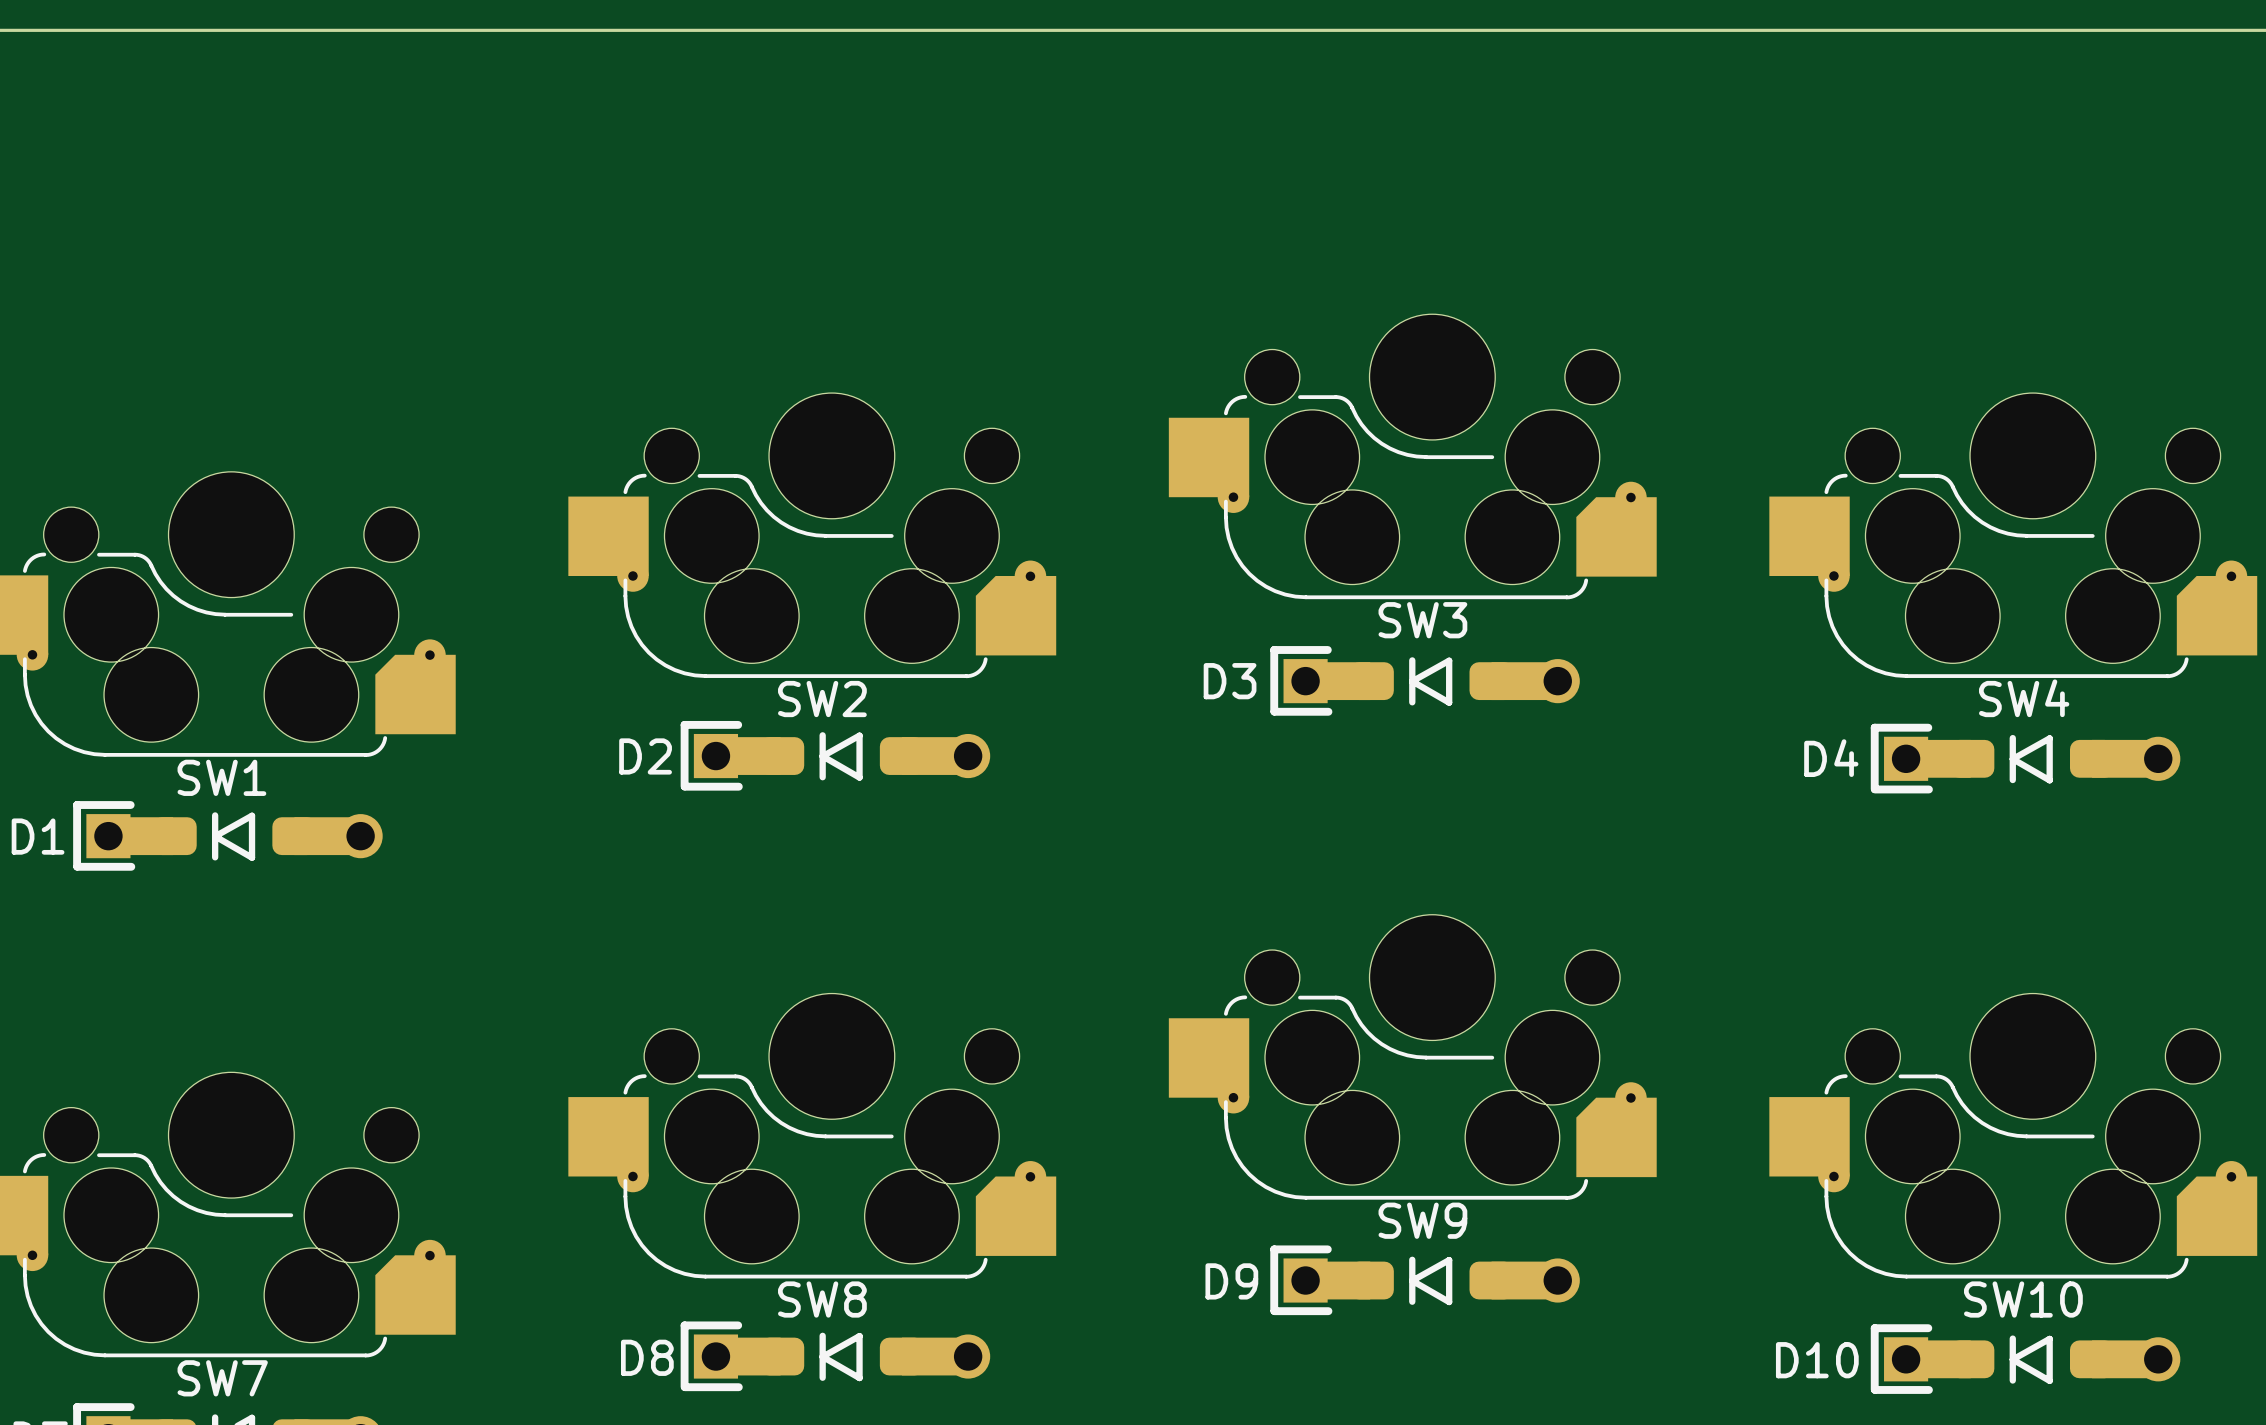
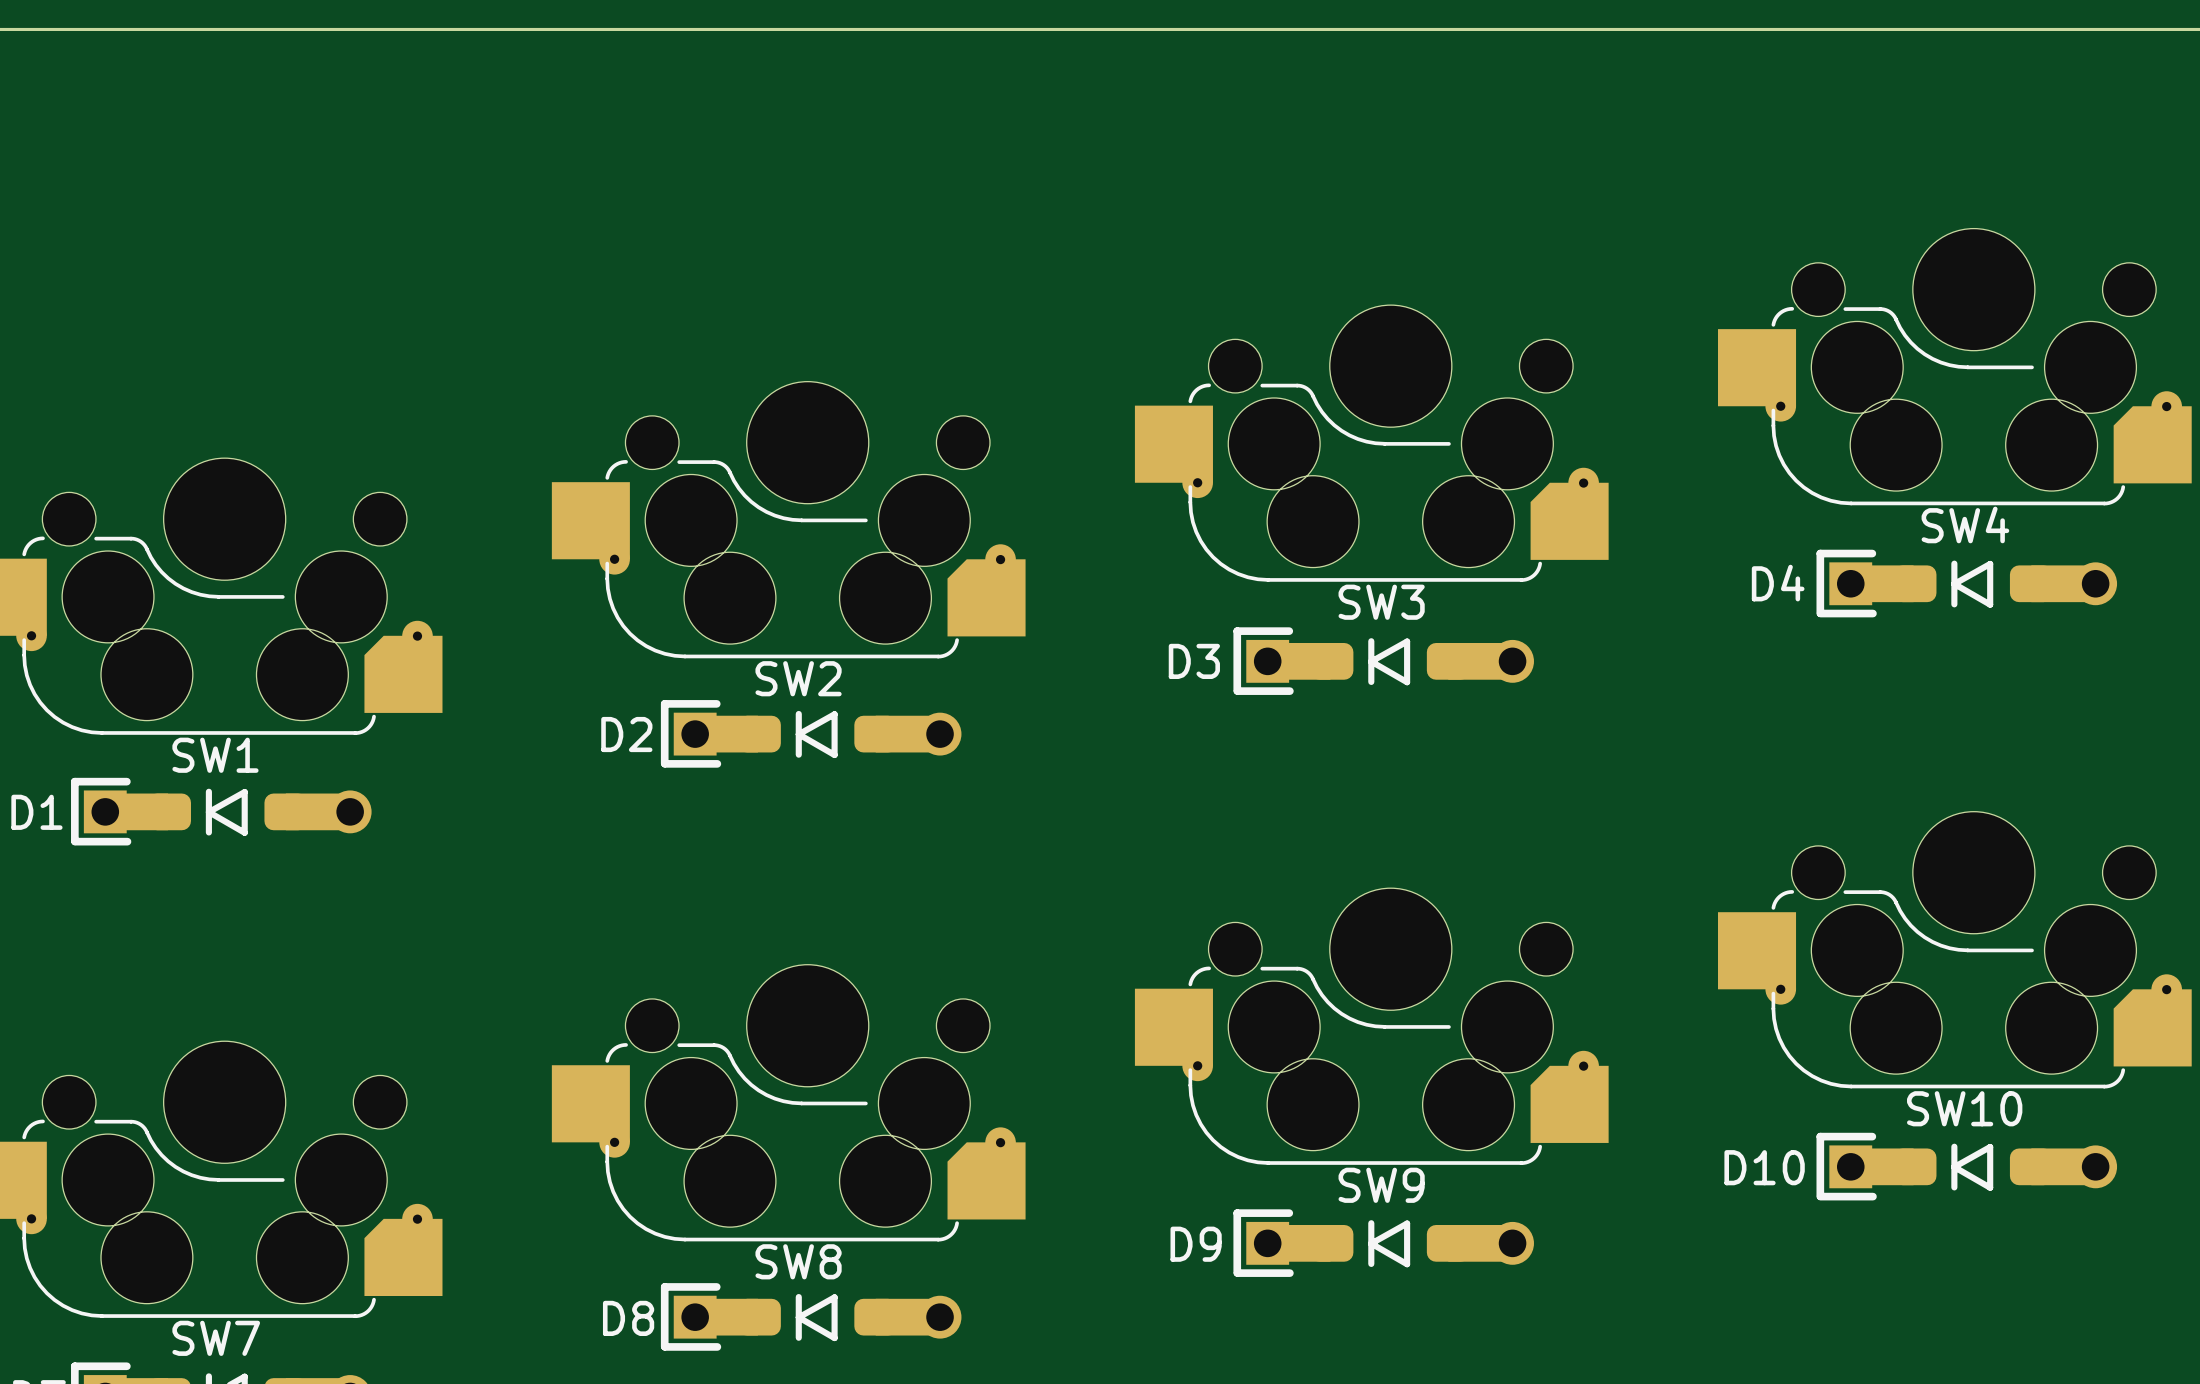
SW4 position: (2013, 535) -> (1954, 367)
D4 position: (2025, 758) -> (1966, 583)
SW10 position: (2013, 1136) -> (1954, 950)
D10 position: (2025, 1359) -> (1966, 1166)

